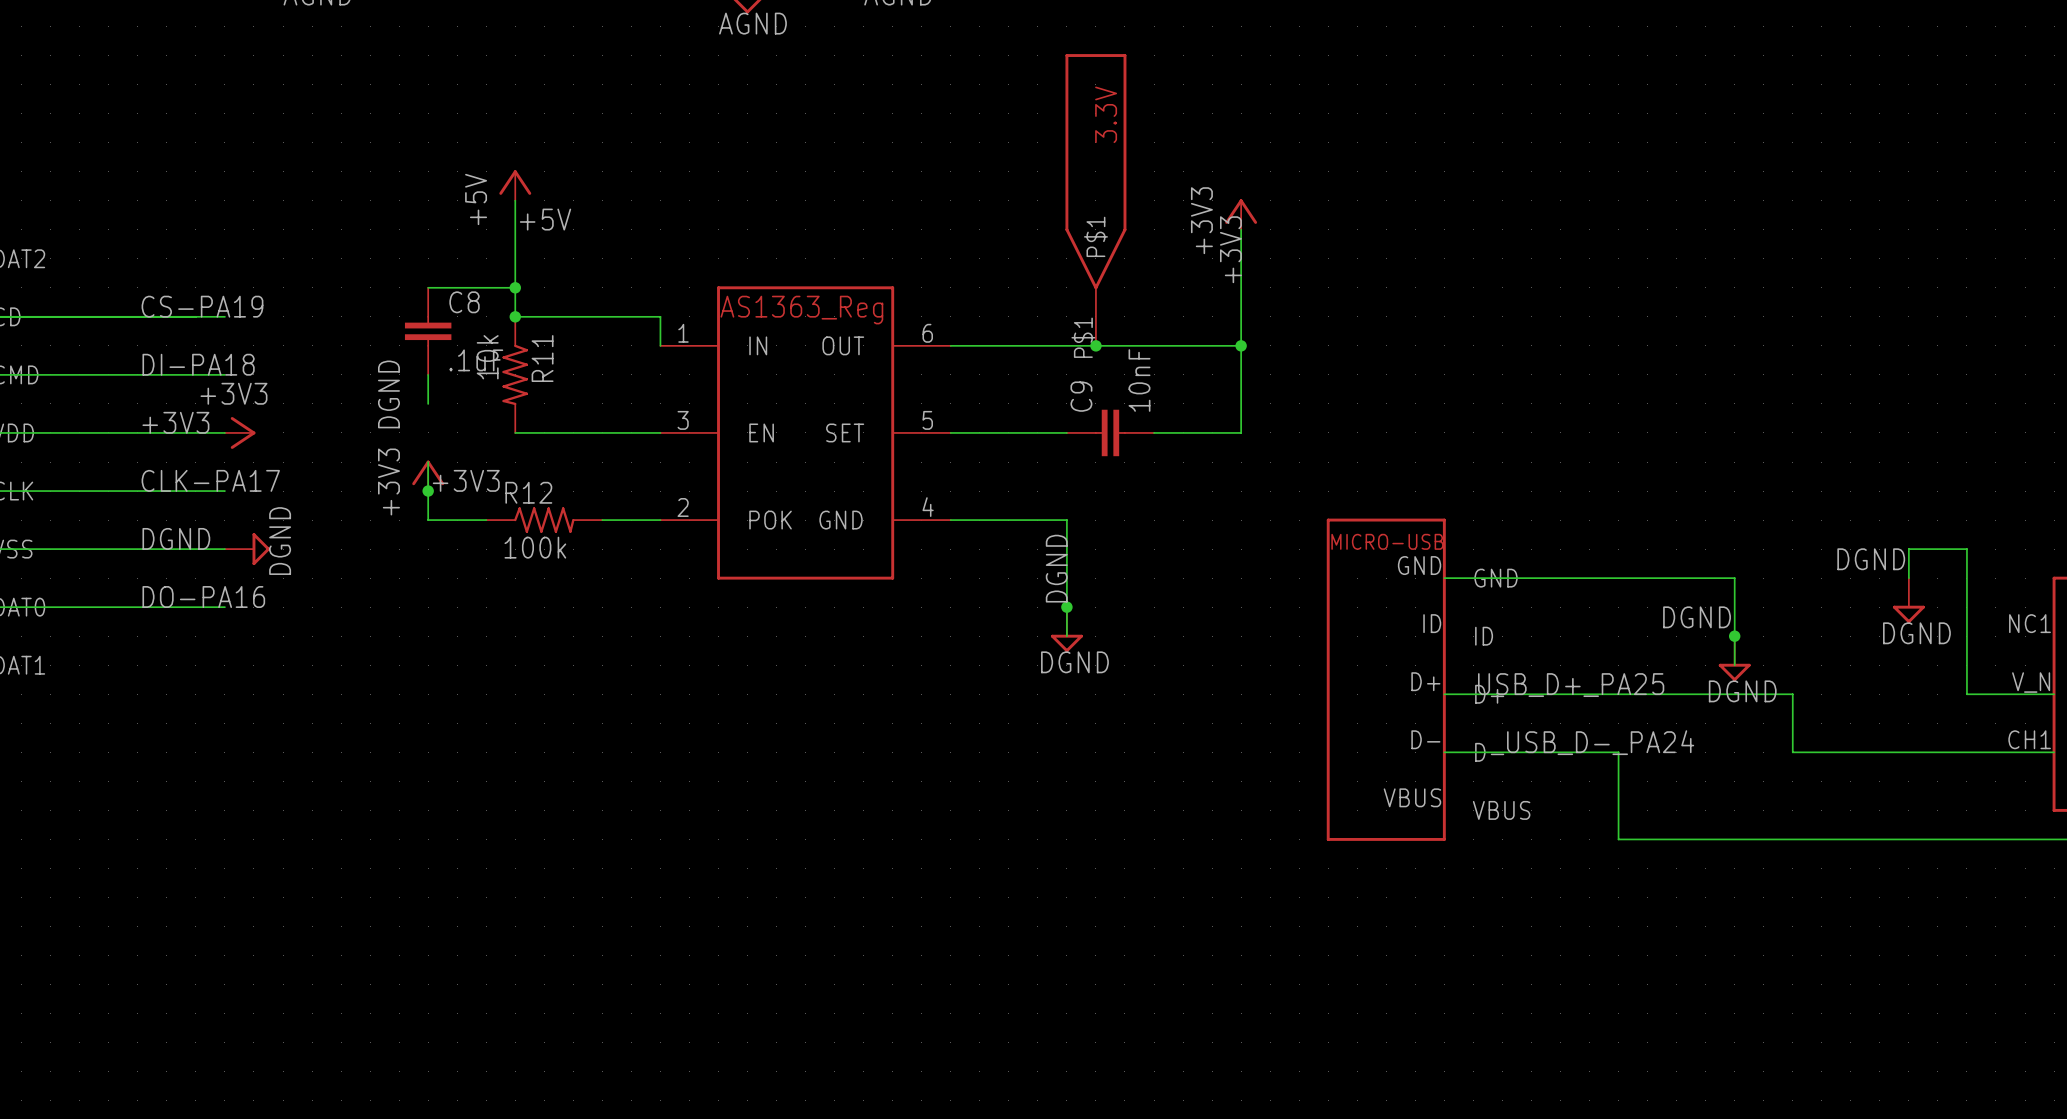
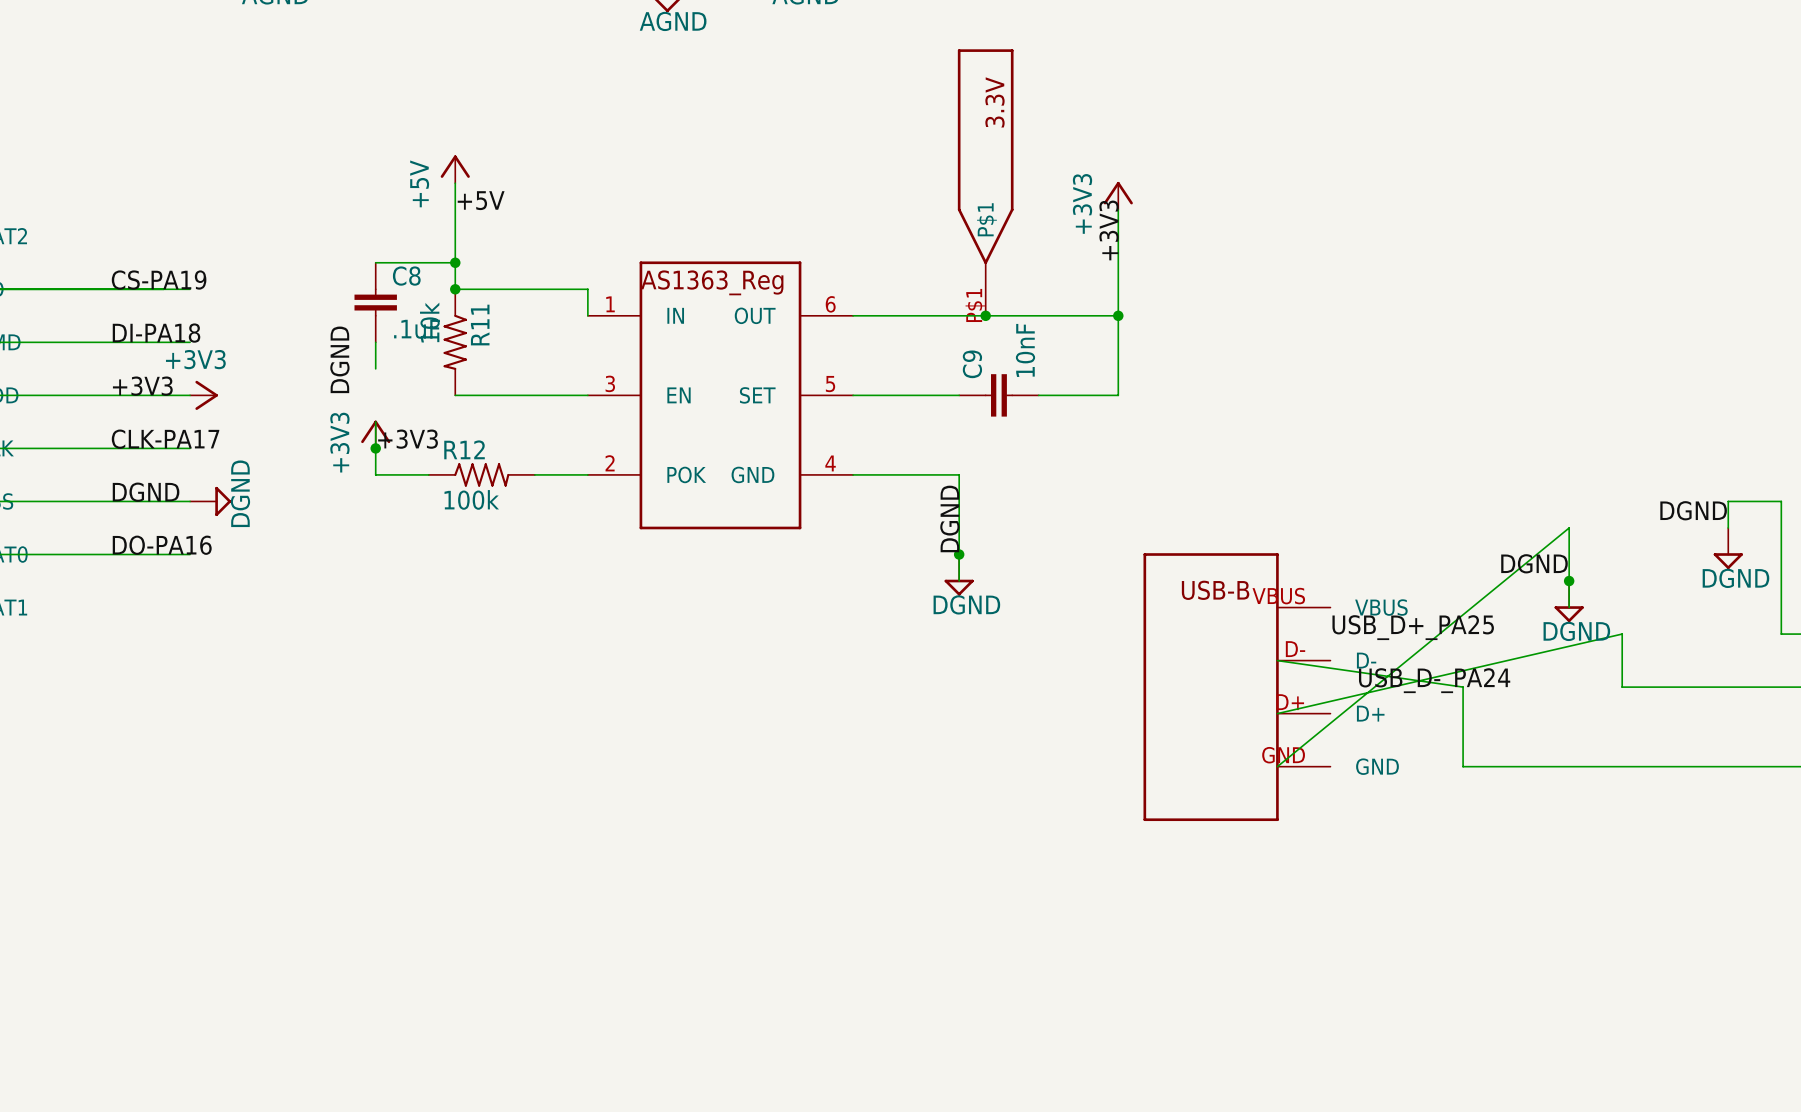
wire: (1444, 578) (1734, 578) -> (1277, 766) (1569, 527)
part: (1386, 679) -> none
wire: (1444, 694) (1792, 694) -> (1277, 713) (1622, 634)
part: none -> (1236, 687)
wire: (1444, 752) (1618, 752) -> (1277, 660) (1463, 687)

